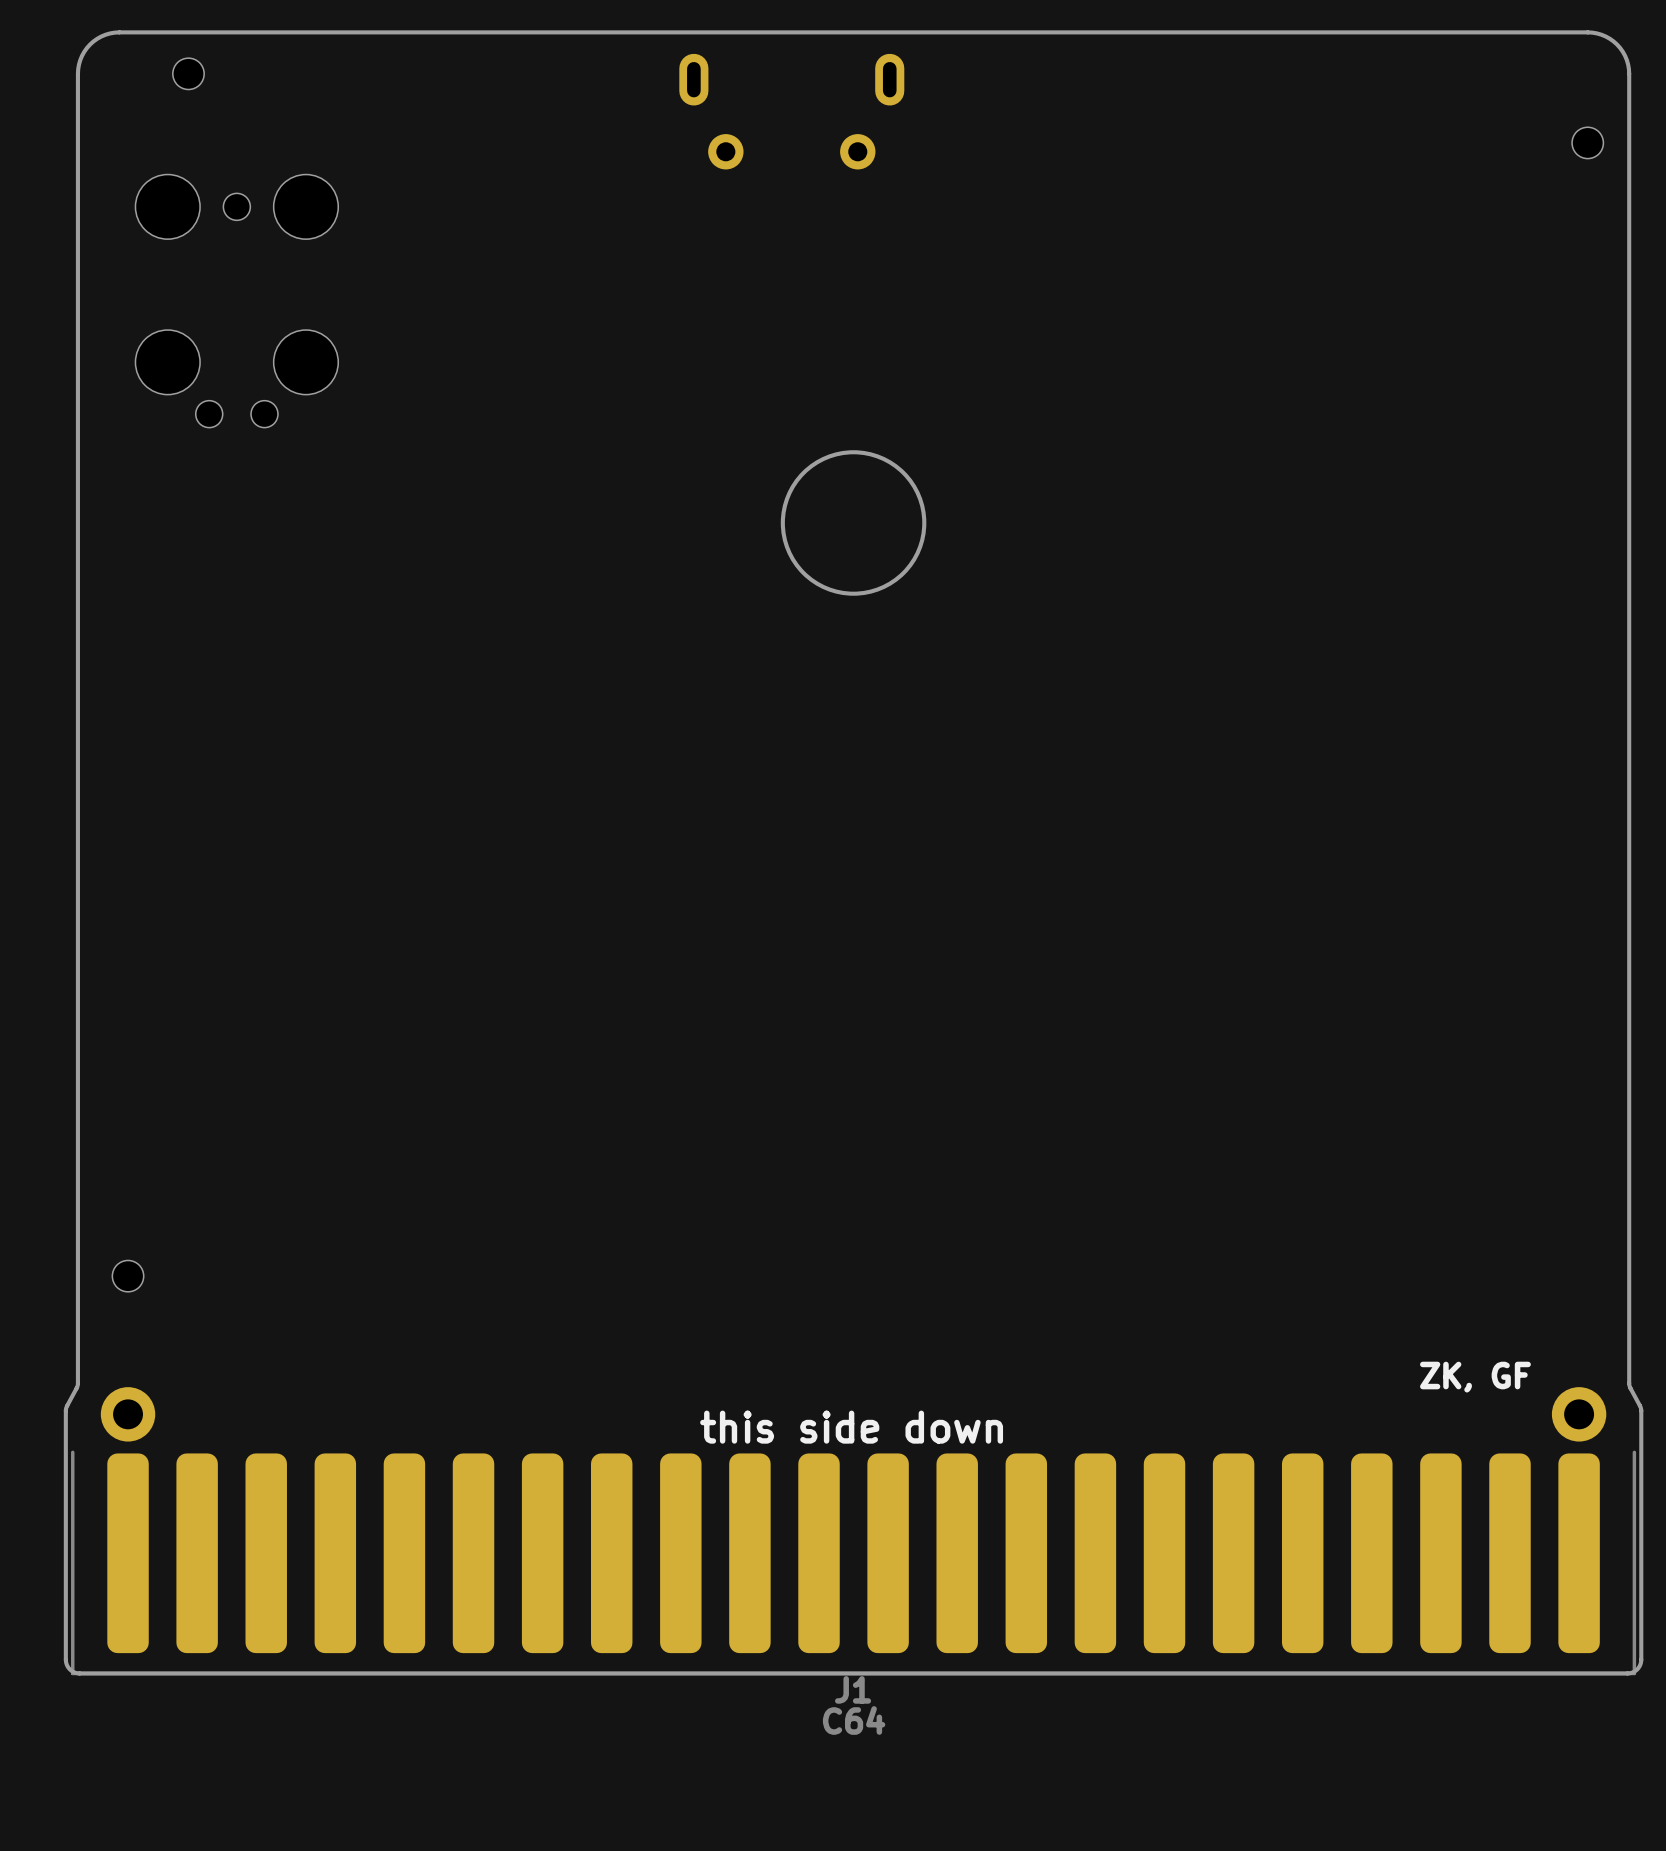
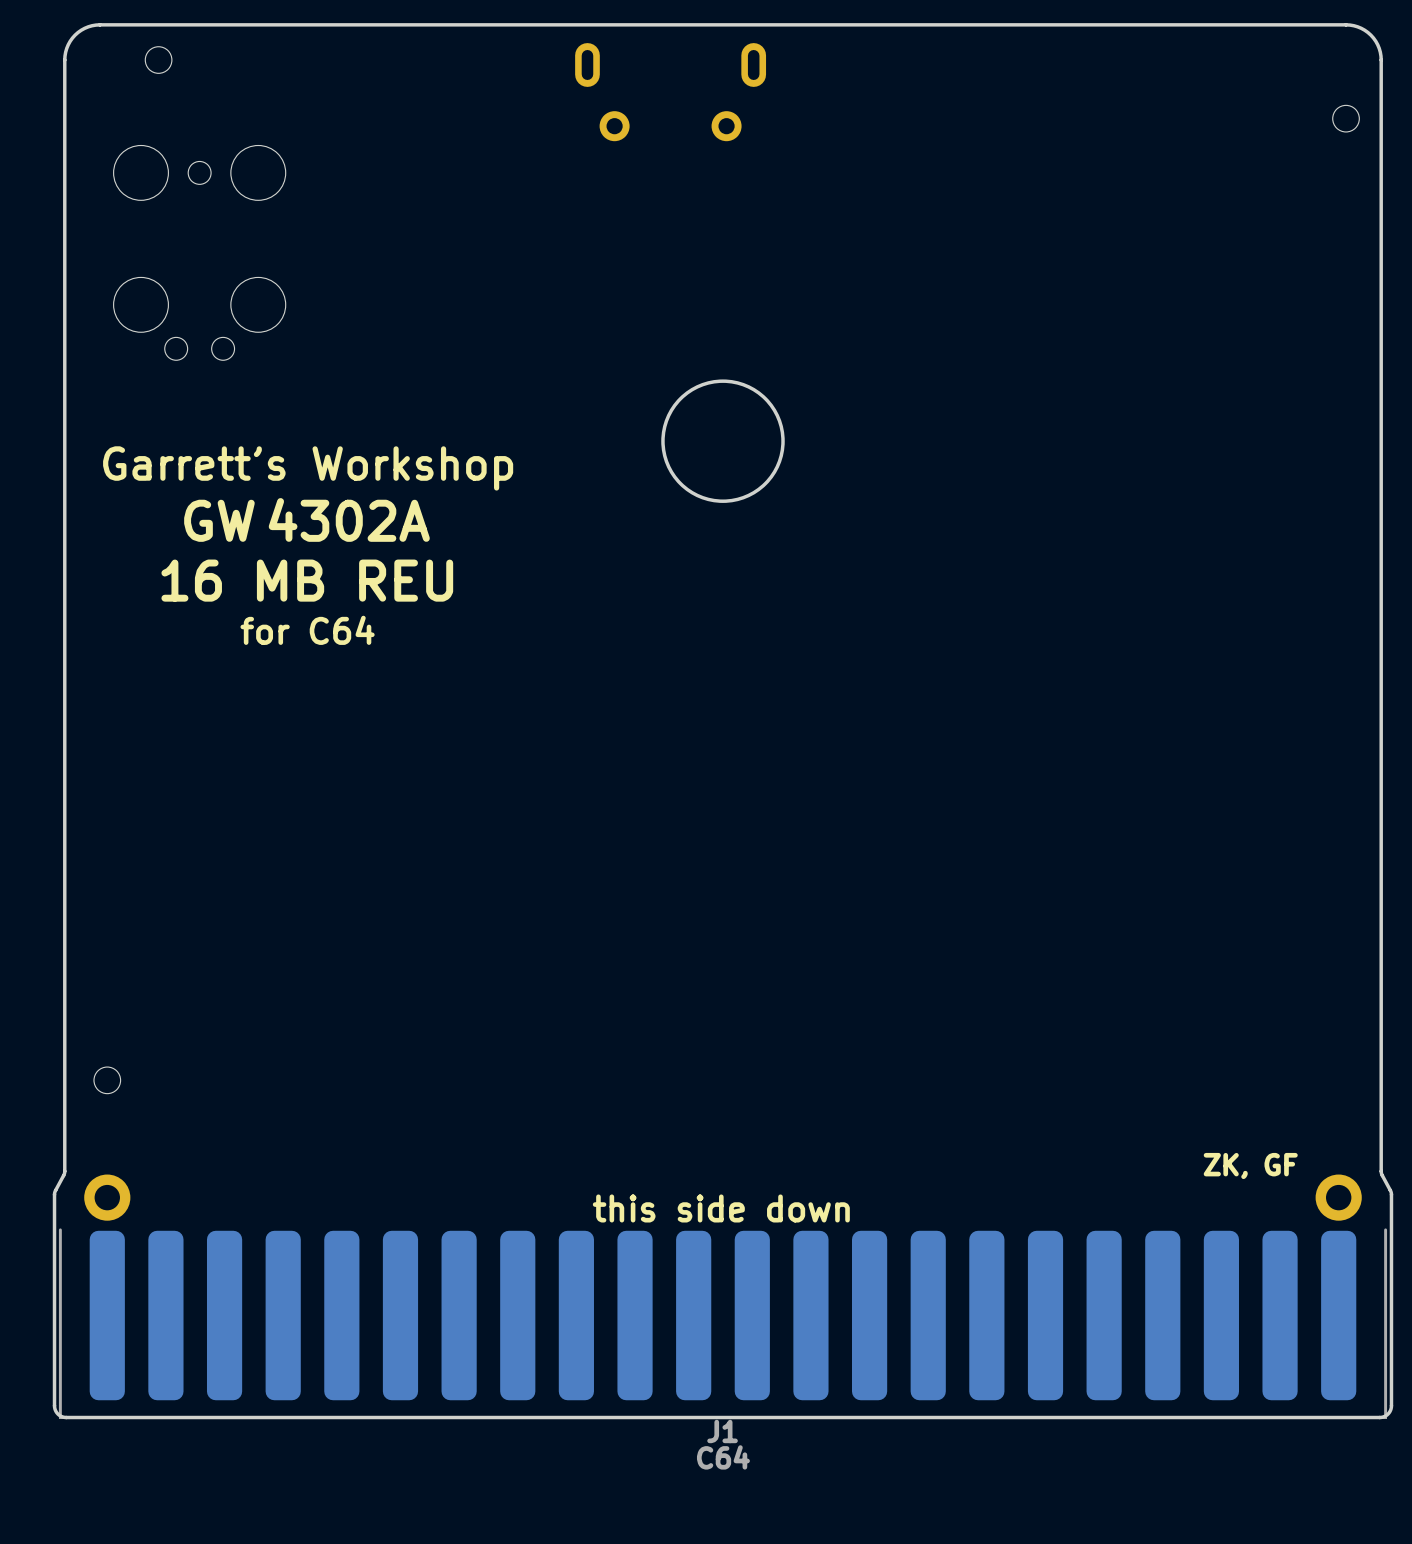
text: none -> Garrett’s Workshop (308, 468)
text: none -> 4302A (349, 519)
text: none -> GW (219, 520)
text: none -> 16 MB REU (307, 580)
text: none -> for C64 (307, 630)

